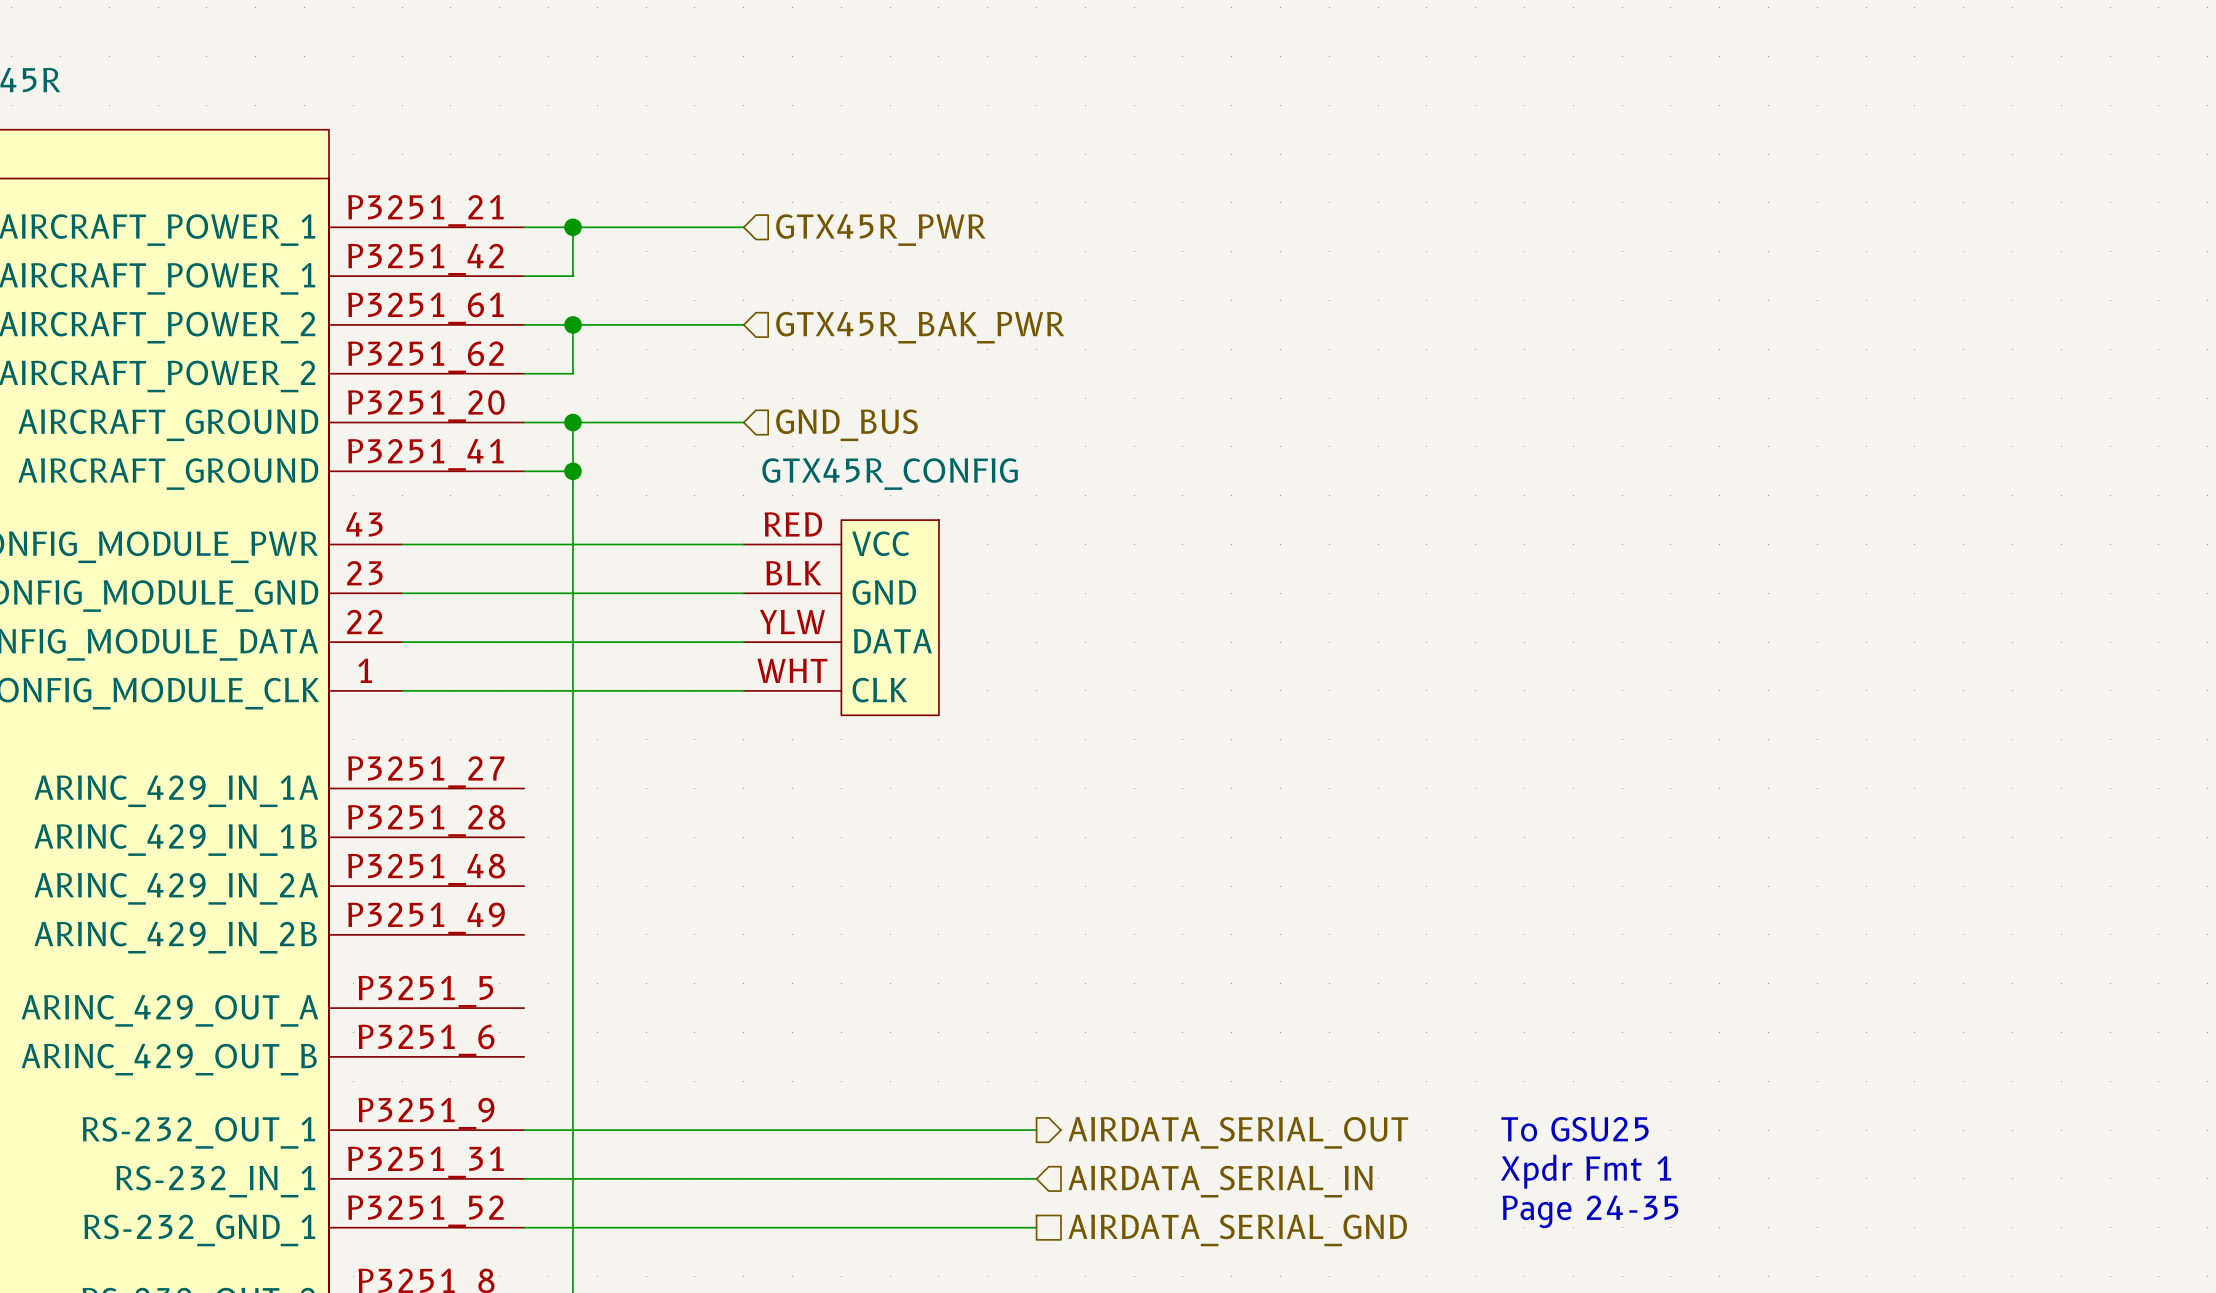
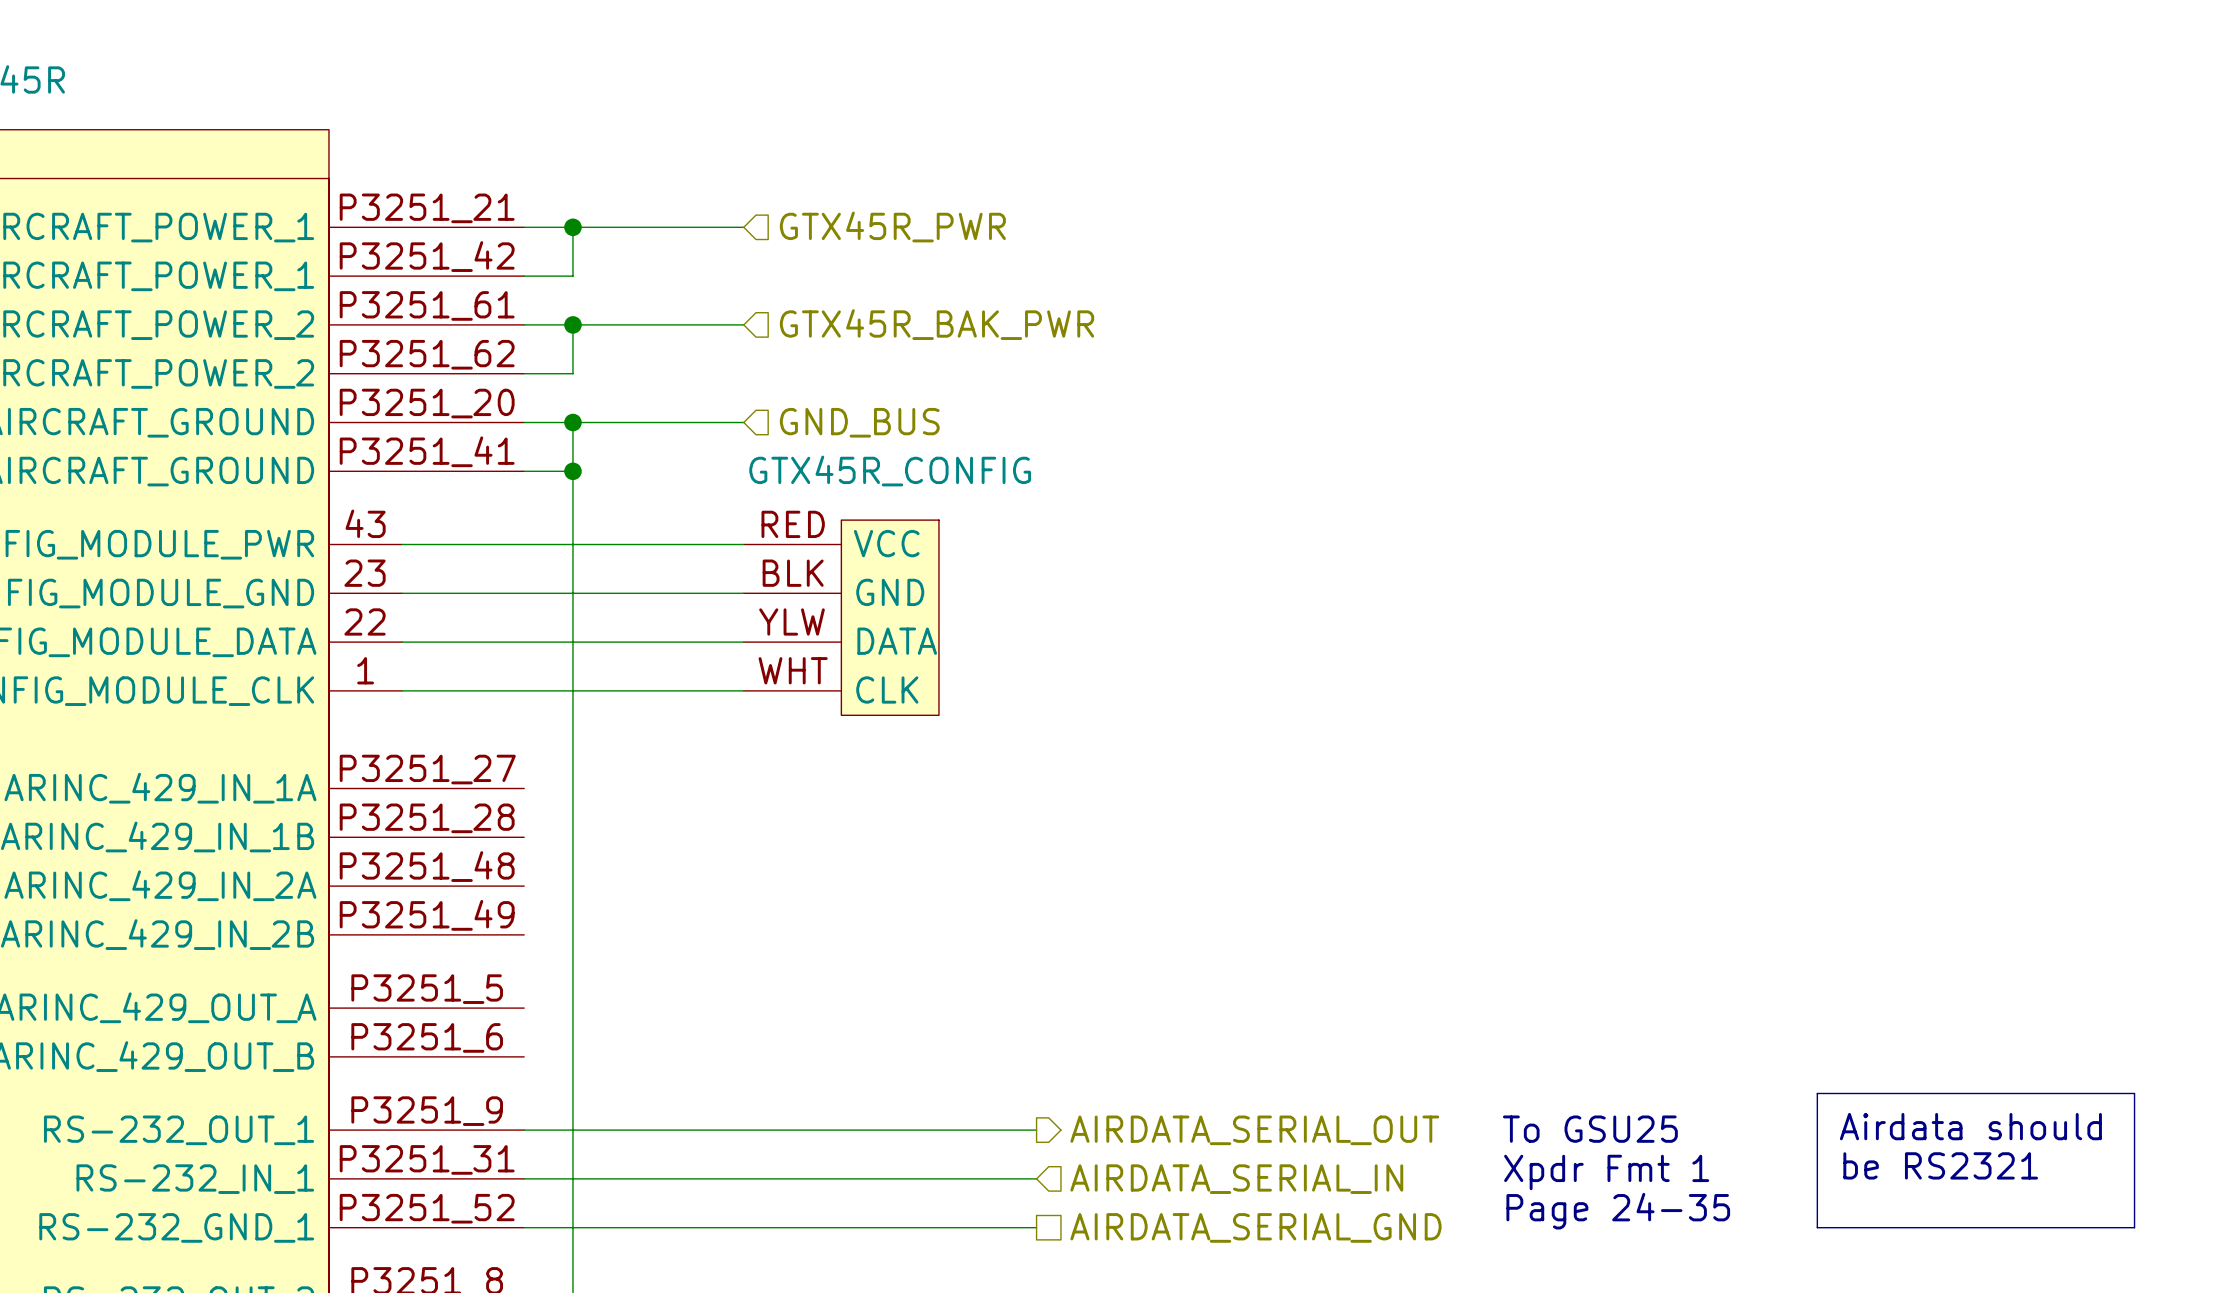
line: none -> (1817, 1093) (2134, 1093) (2134, 1227) (1817, 1227) (1817, 1093)
text: none -> Airdata should (1970, 1126)
text: none -> be RS2321 (1940, 1165)

